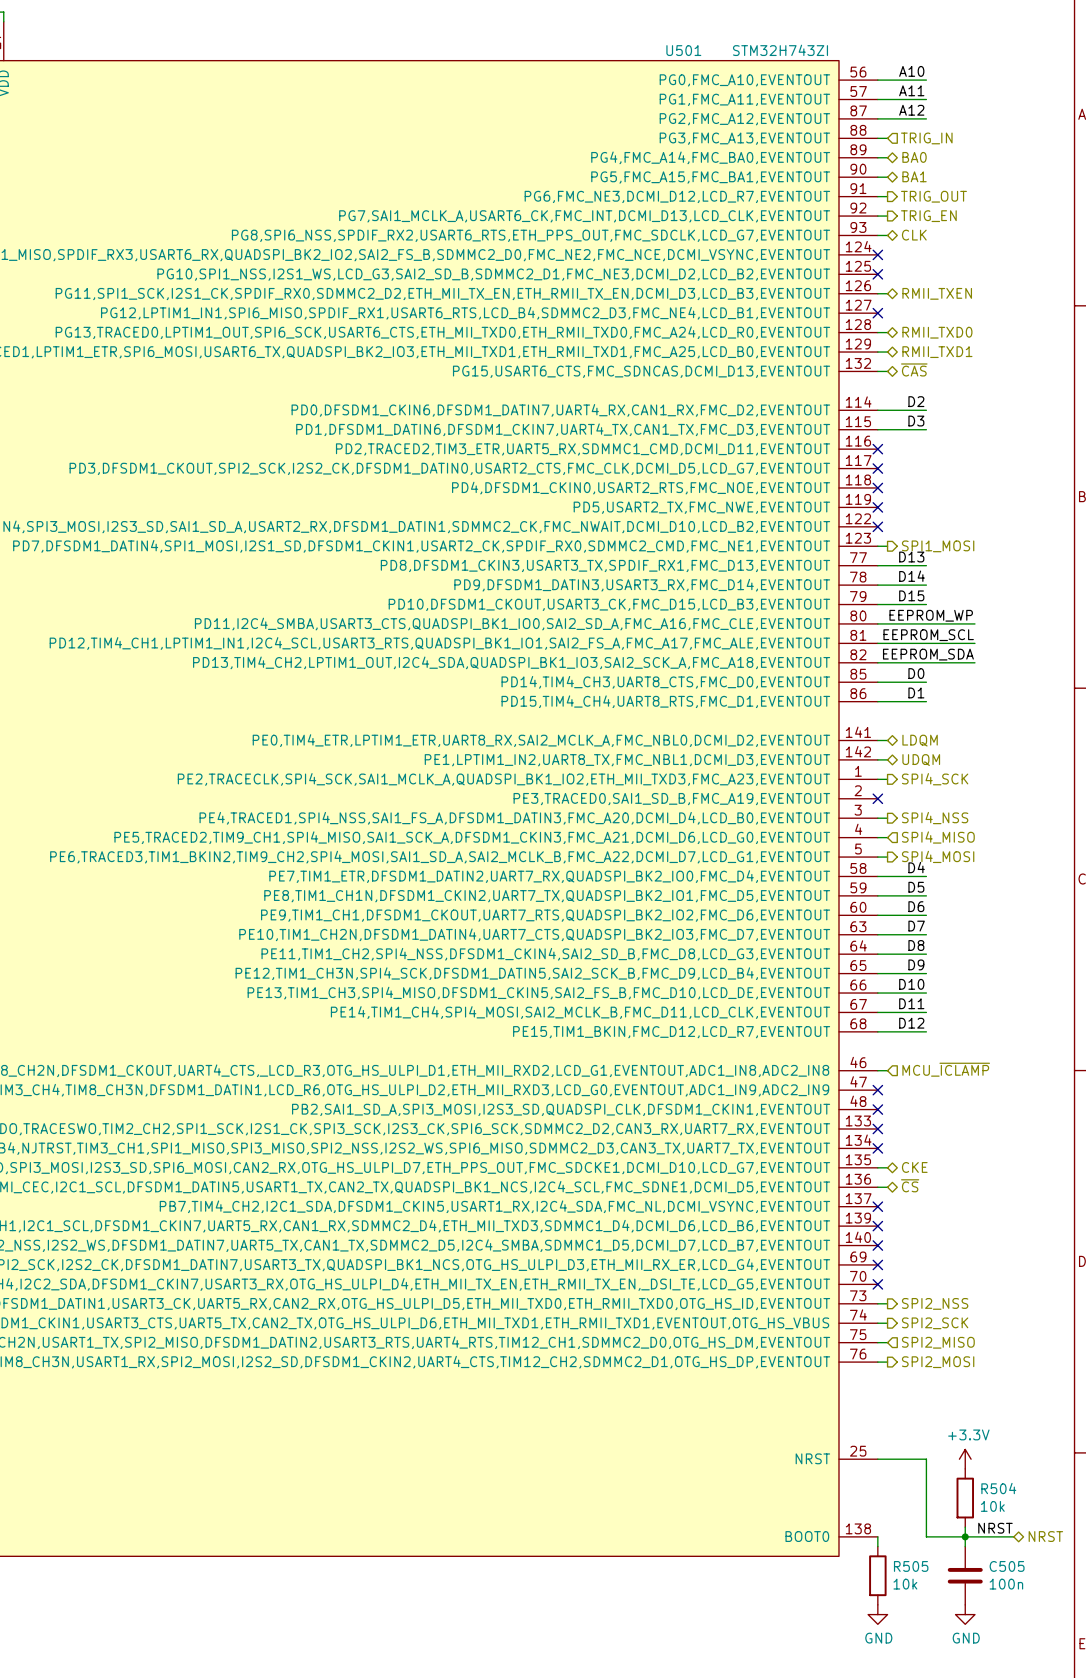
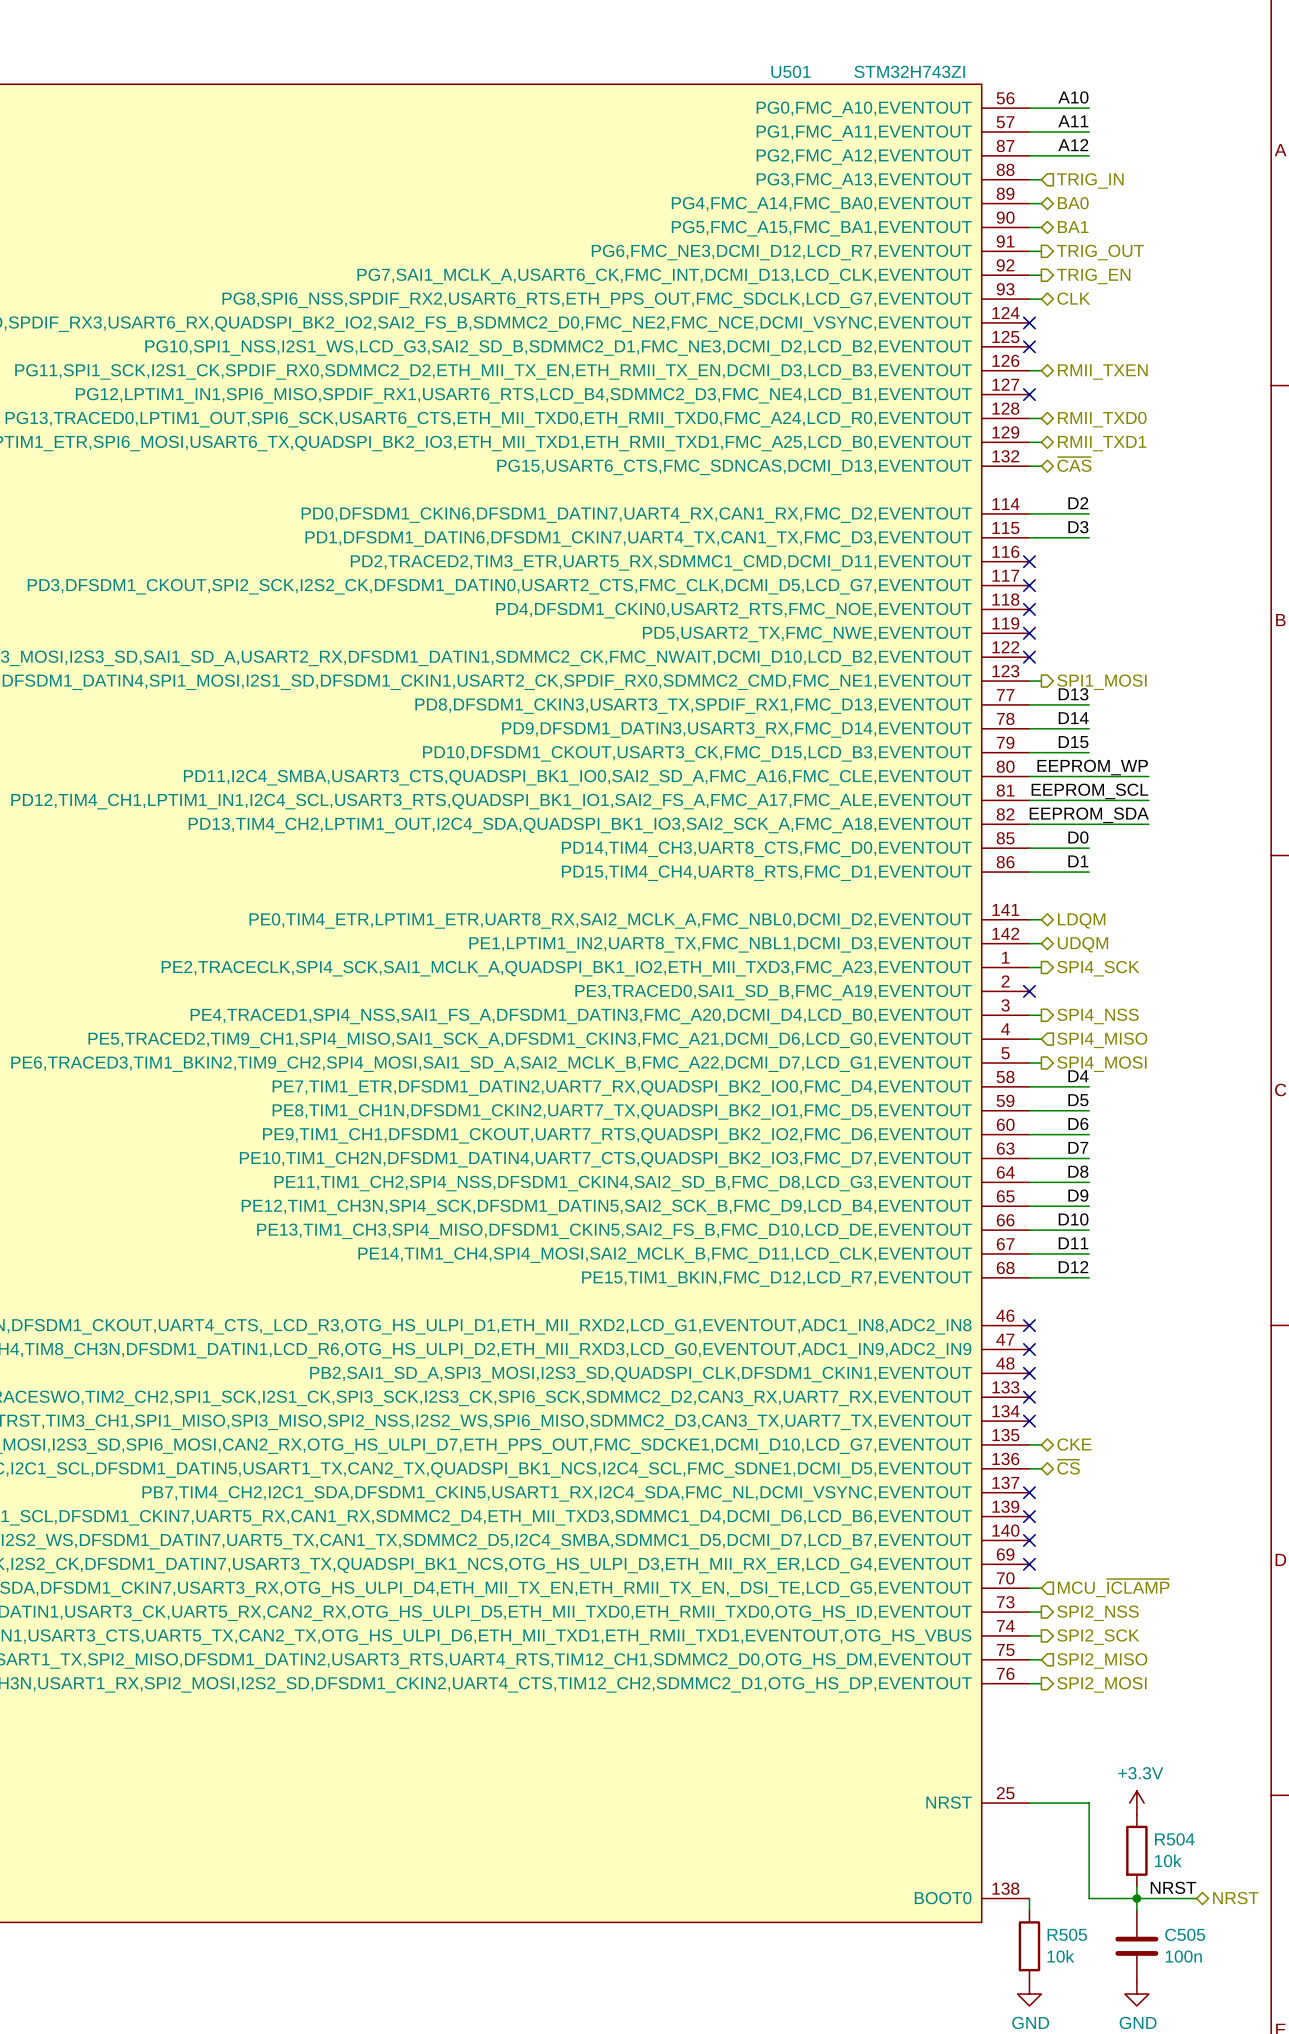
hierarchical label: MCU_~{ICLAMP} (946, 1069) -> none
wire: (877, 1070) (887, 1070) -> none
no-connect mark: none -> (1029, 1325)
hierarchical label: none -> MCU_~{ICLAMP} (1113, 1588)
wire: none -> (1029, 1588) (1041, 1588)
no-connect mark: (877, 1284) -> none

